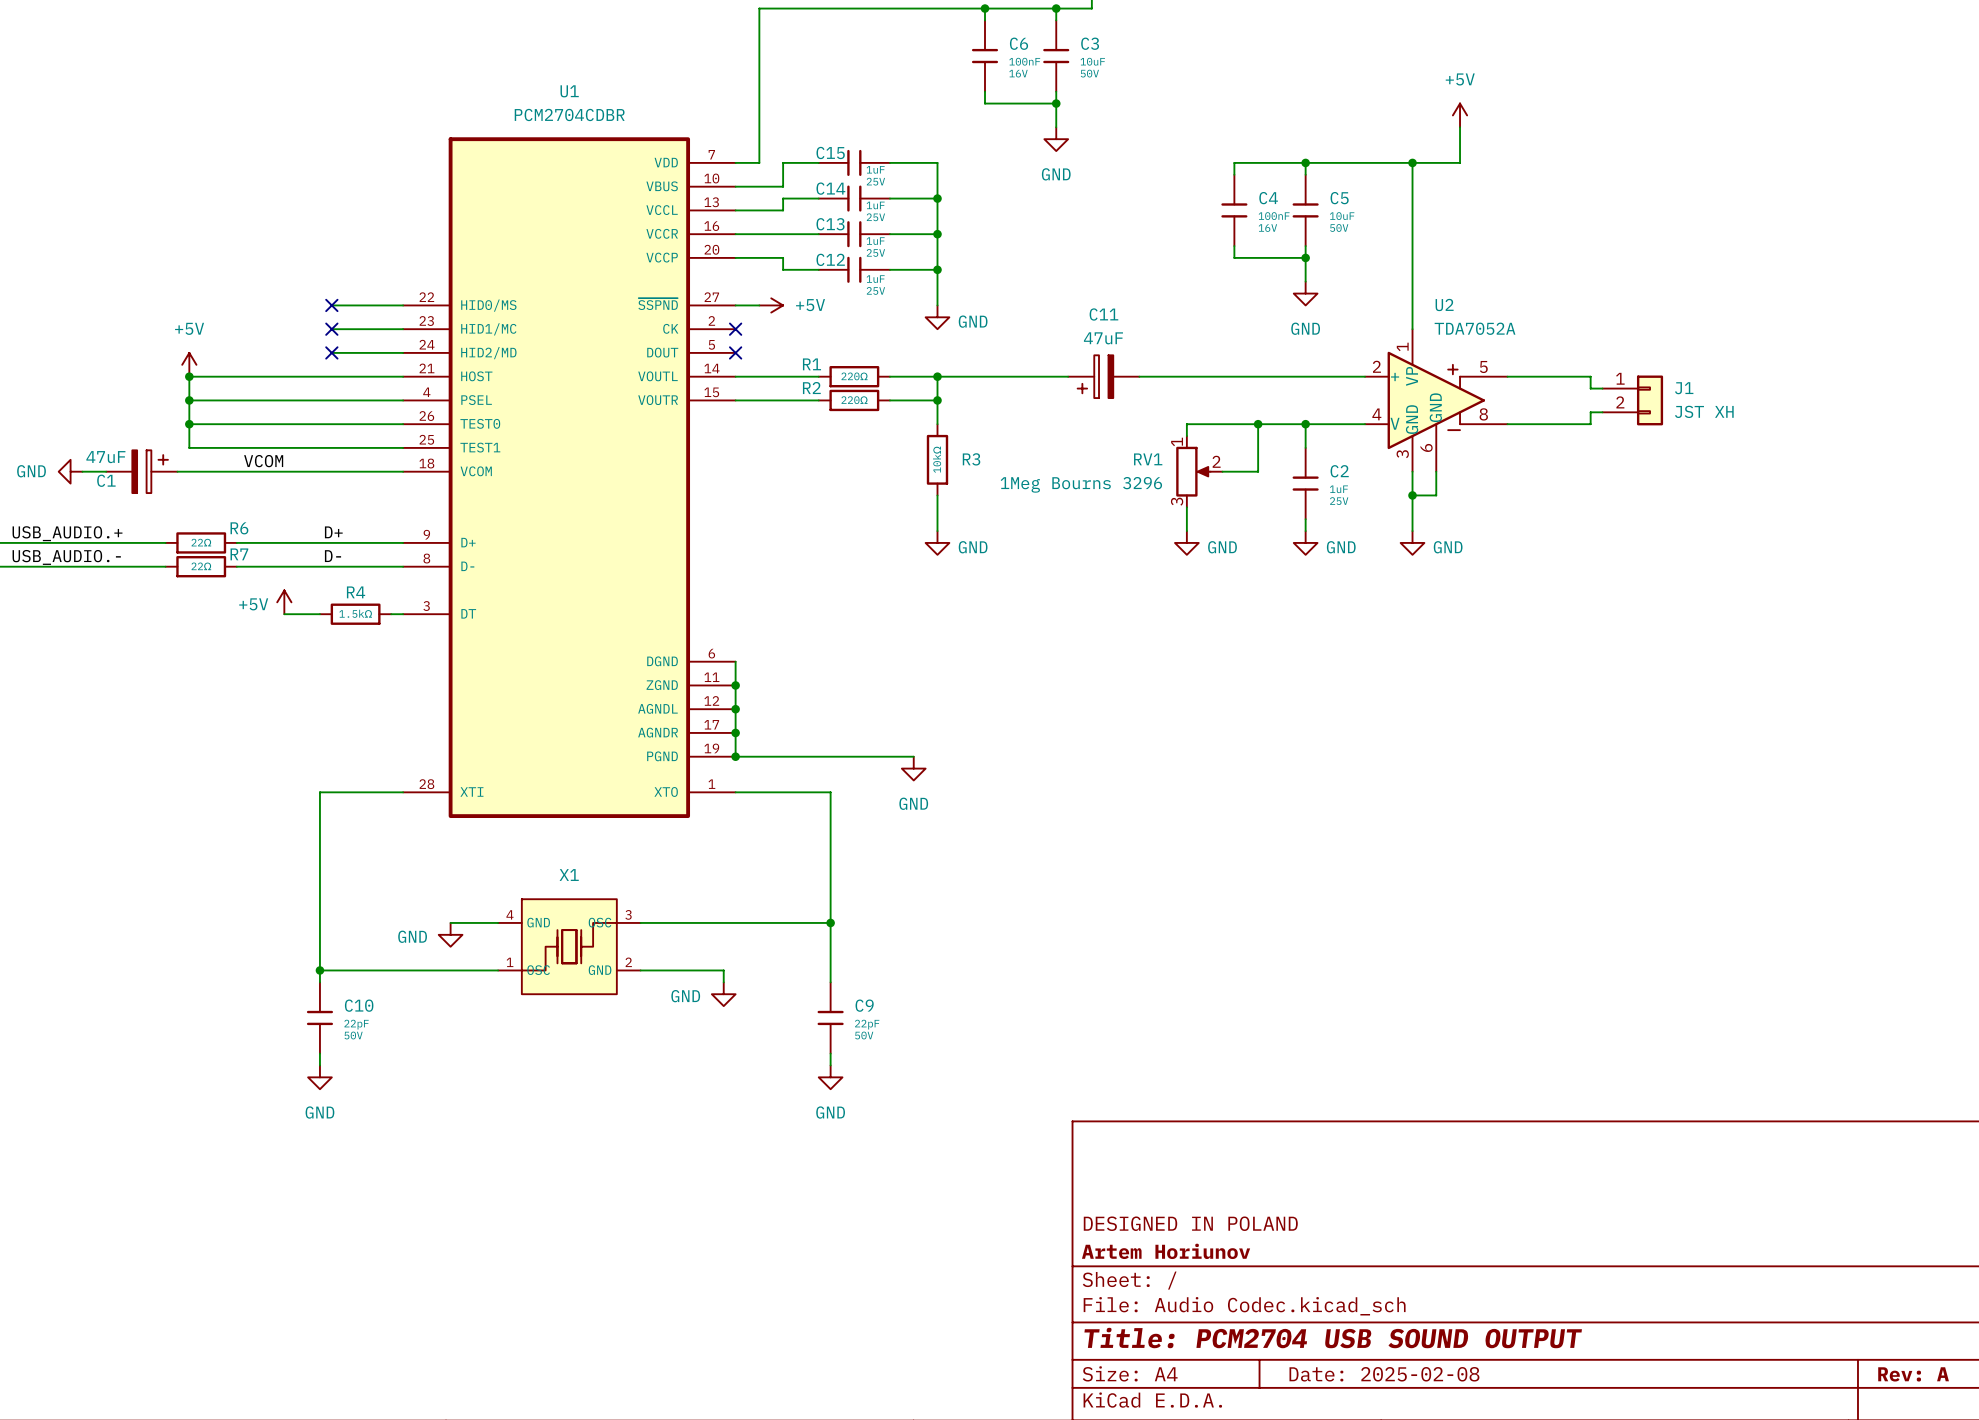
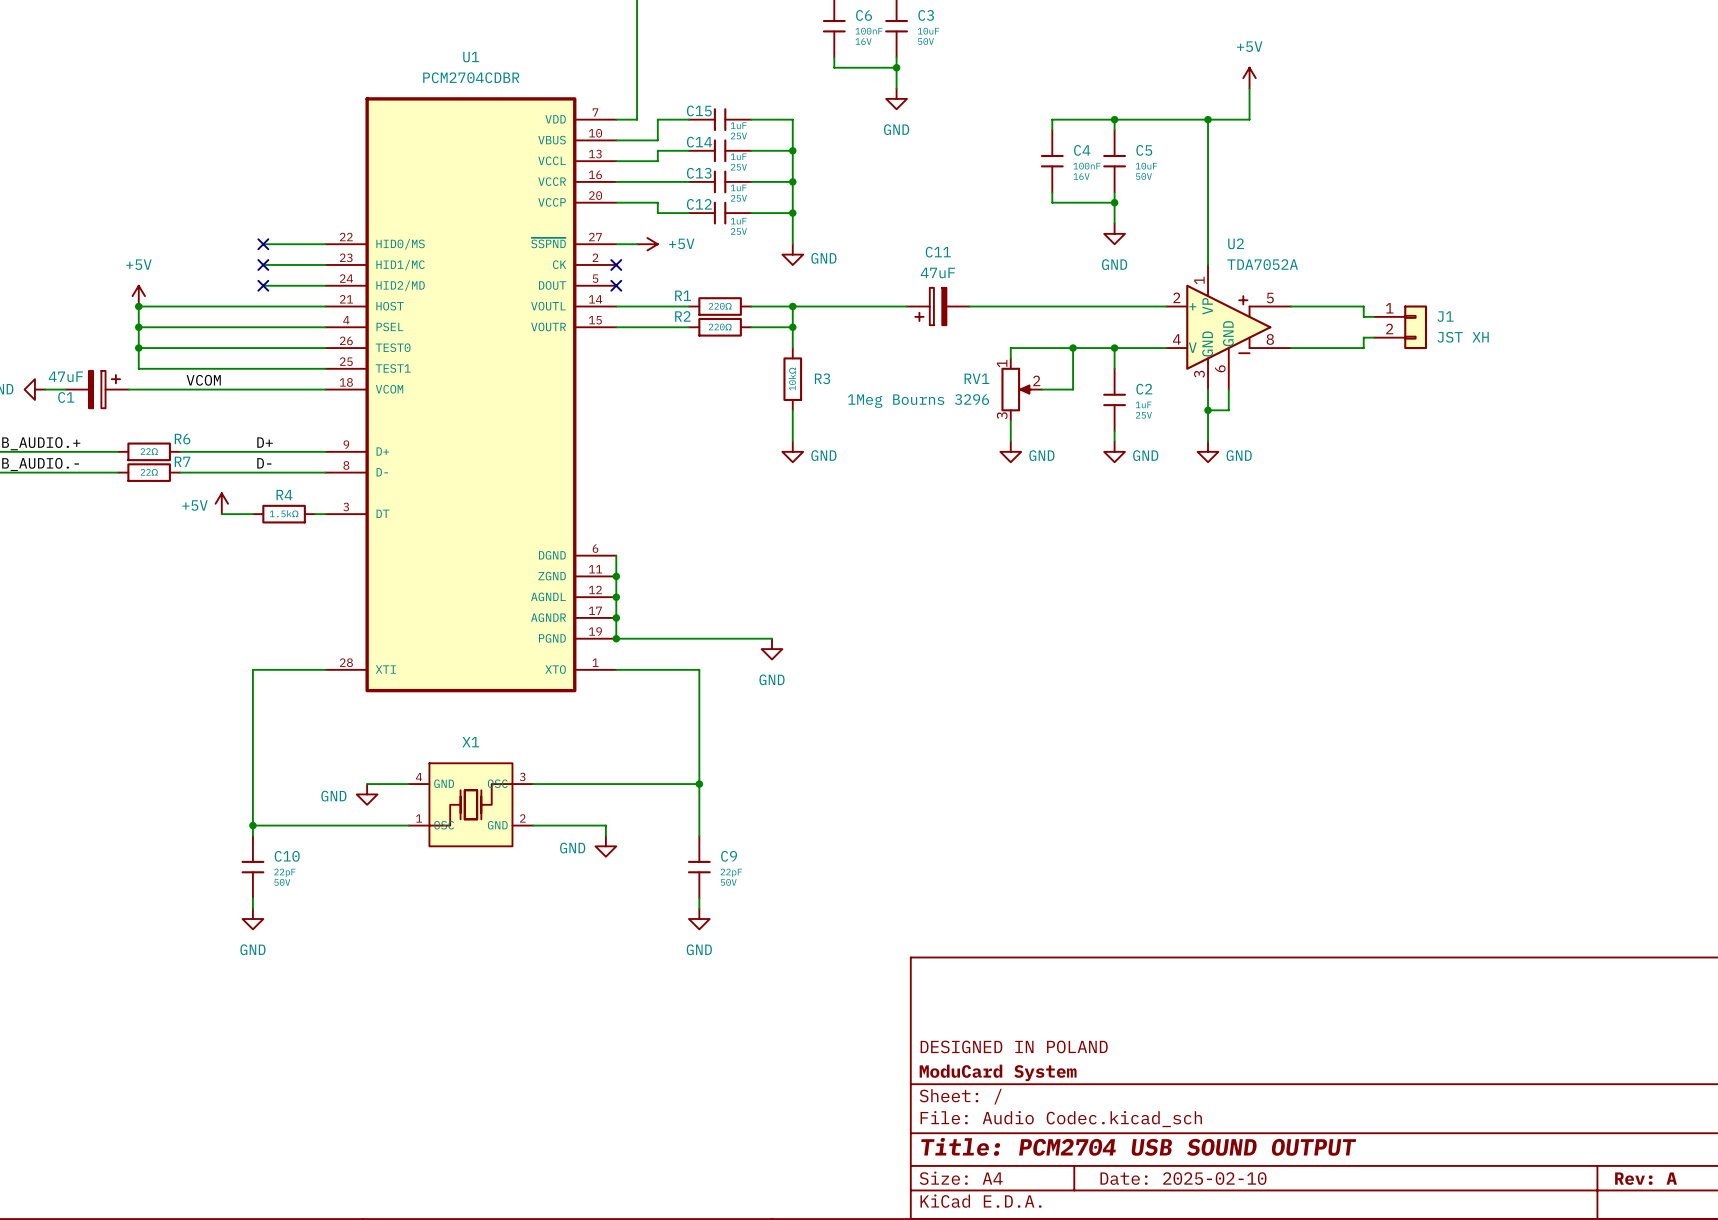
title block: Artem Horiunov (1166, 1251) -> ModuCard System (998, 1072)
title block: Date: 2025-02-08 (1384, 1374) -> Date: 2025-02-10 (1183, 1178)

